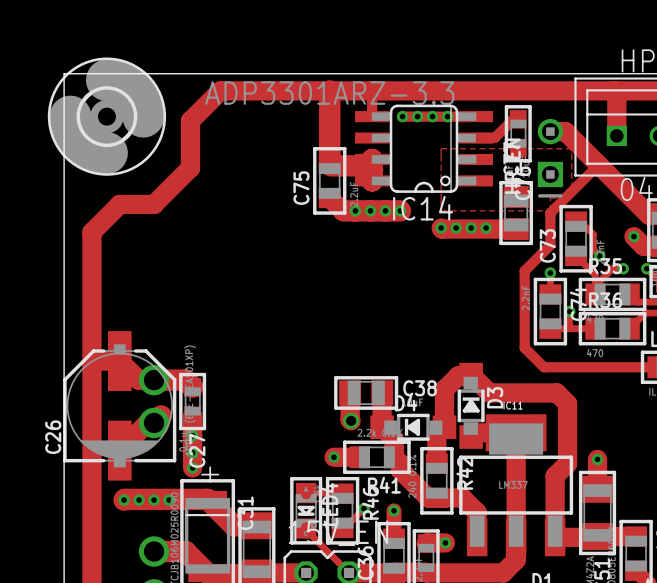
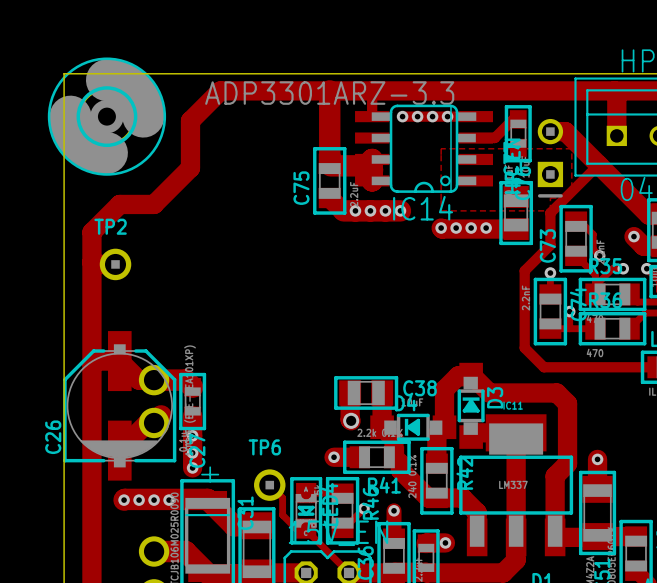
TP2: none -> (115, 264)
track: none -> (269, 485) (282, 497) (282, 515) (296, 528) (306, 528)
TP6: none -> (269, 485)

